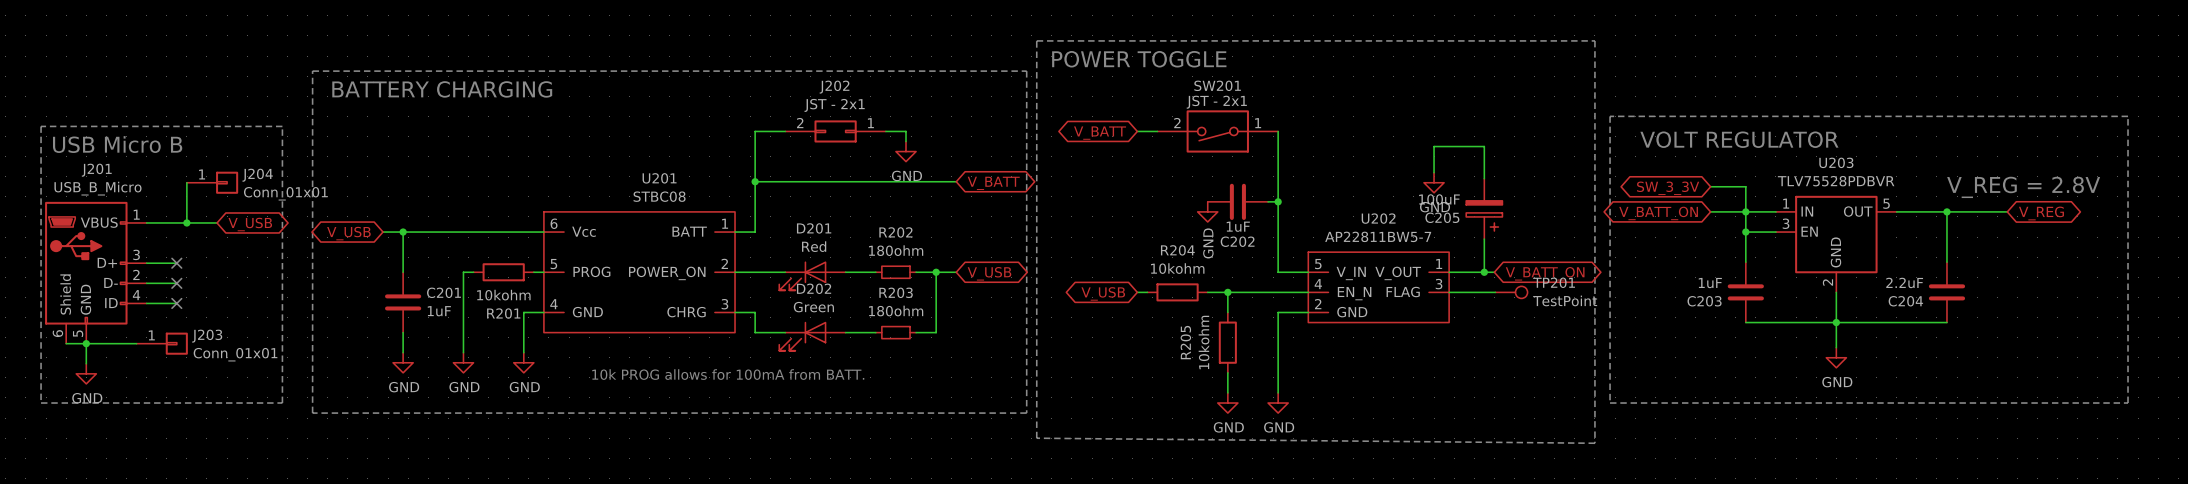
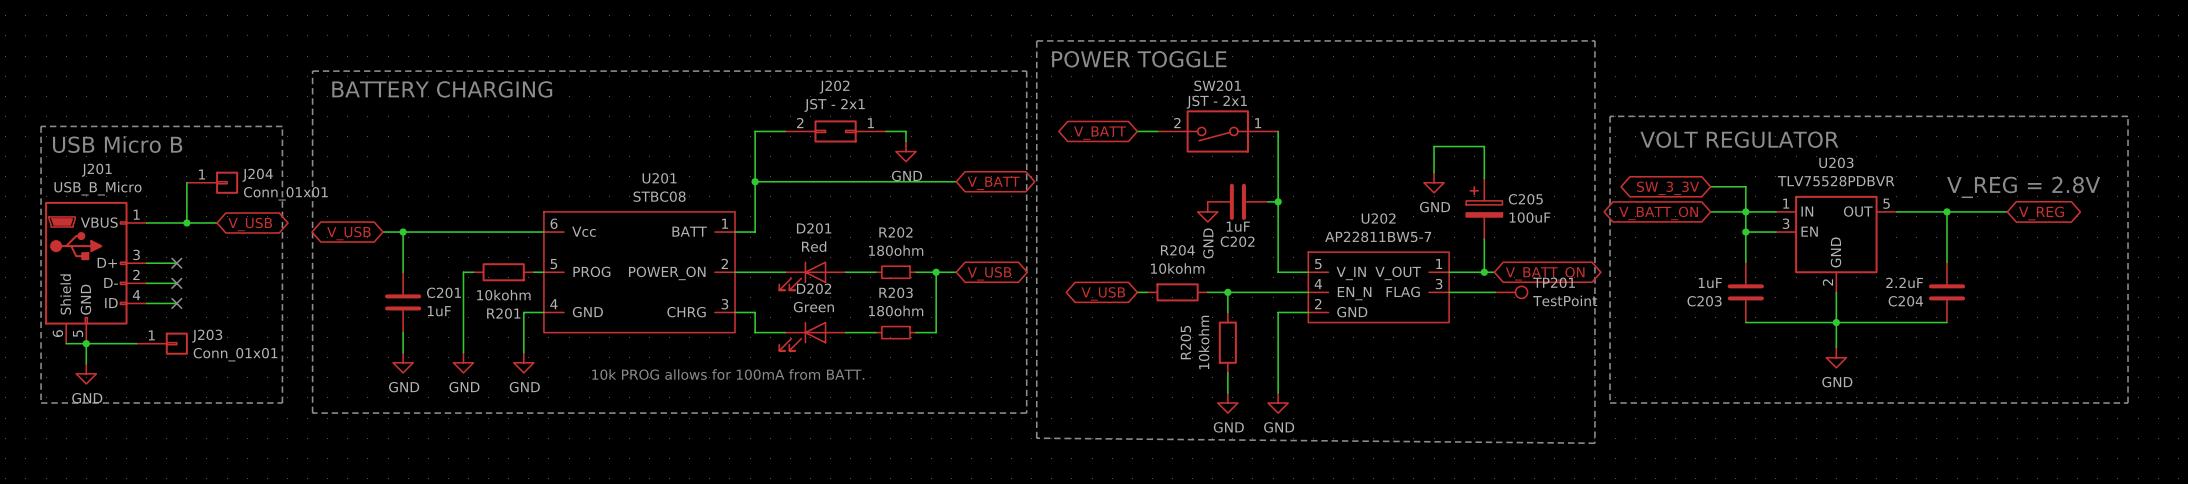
C205 rotation: 0° (1484, 215) -> 180° (1484, 201)

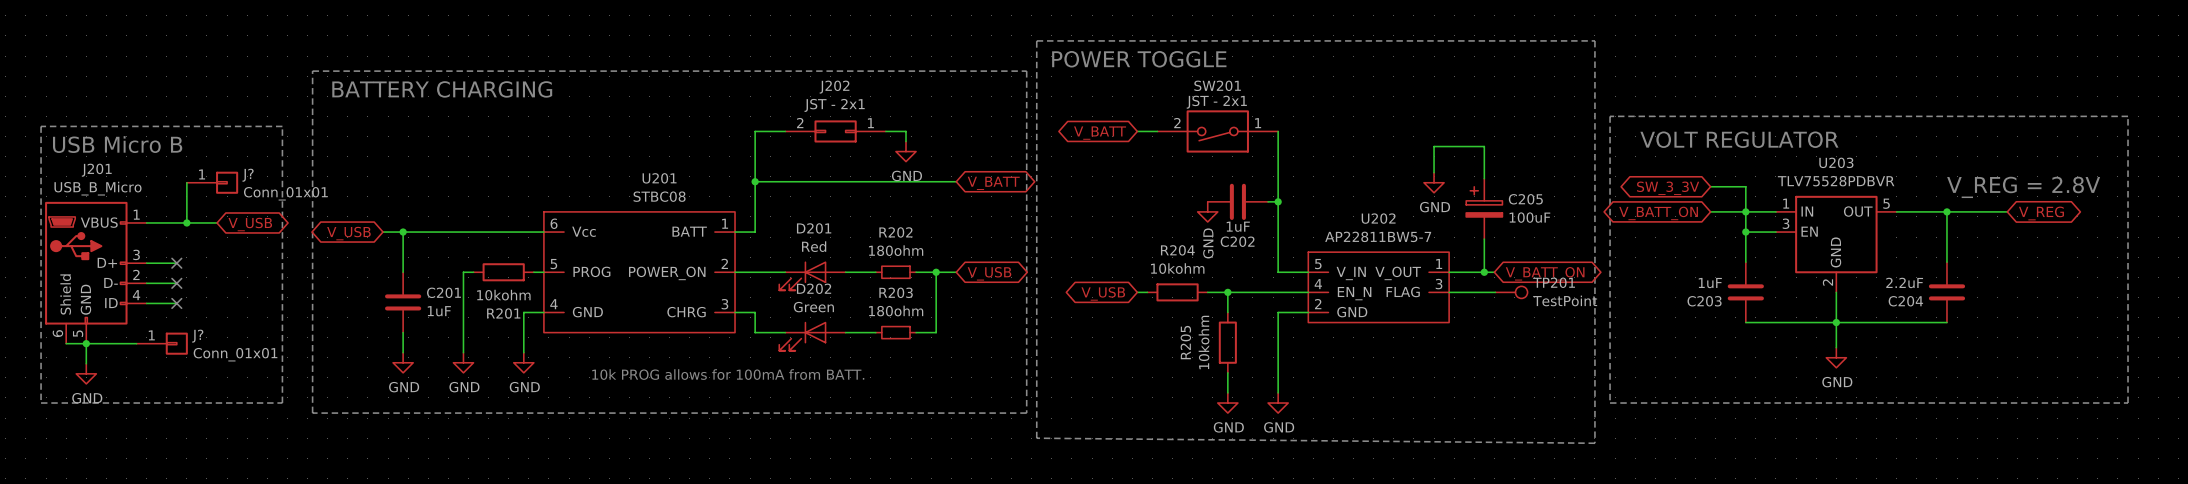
J204 name: J204 (257, 175) -> J? (248, 175)
J203 name: J203 (207, 336) -> J? (197, 336)

